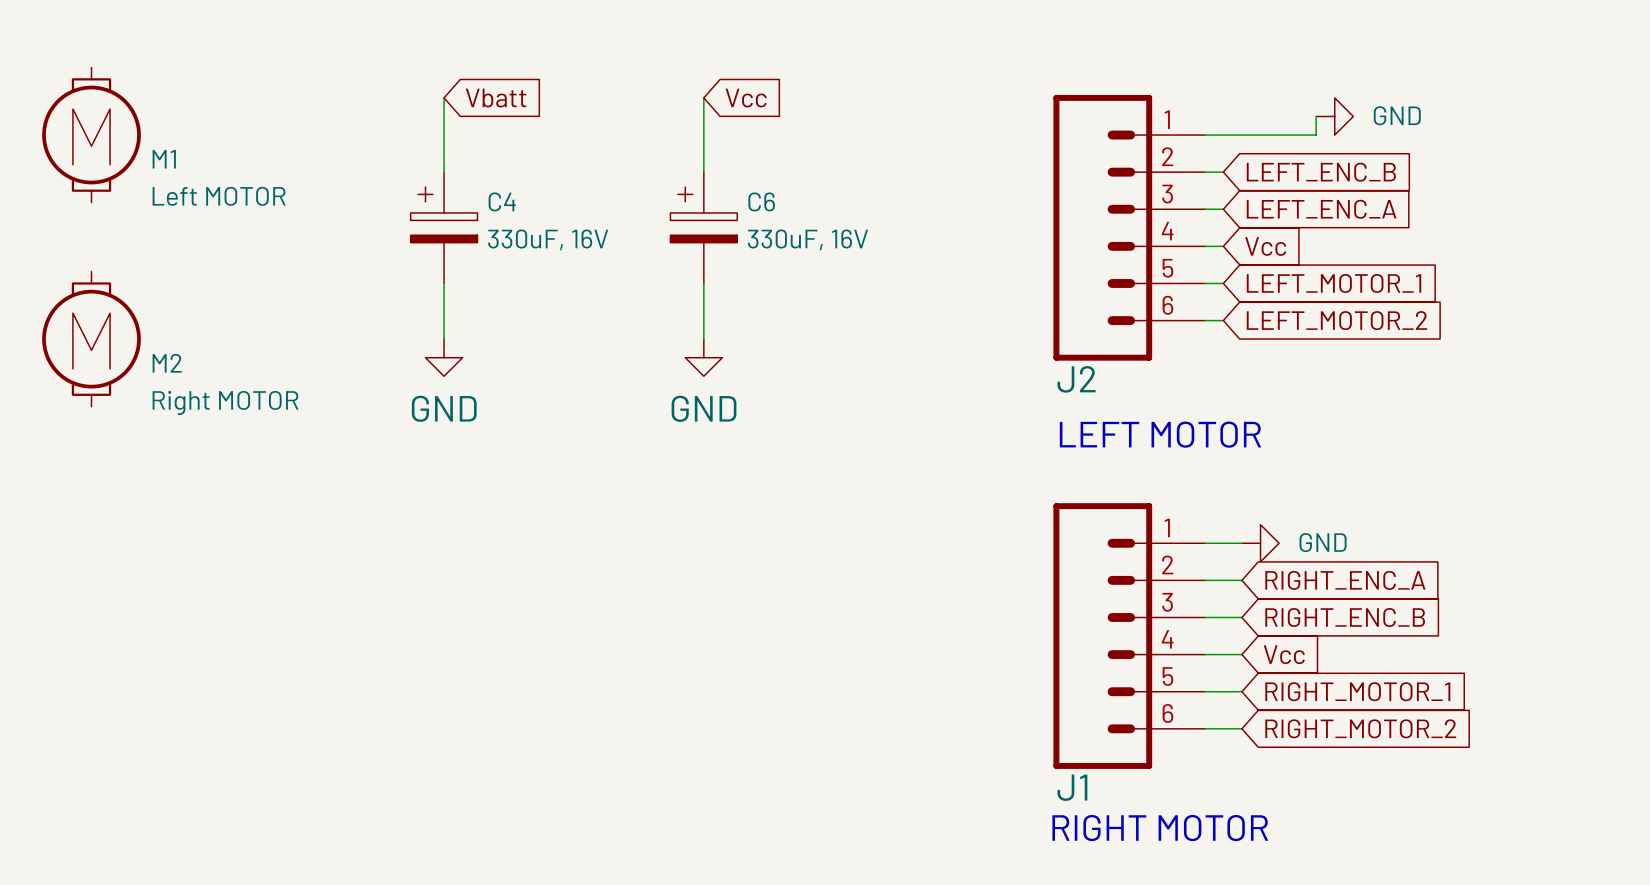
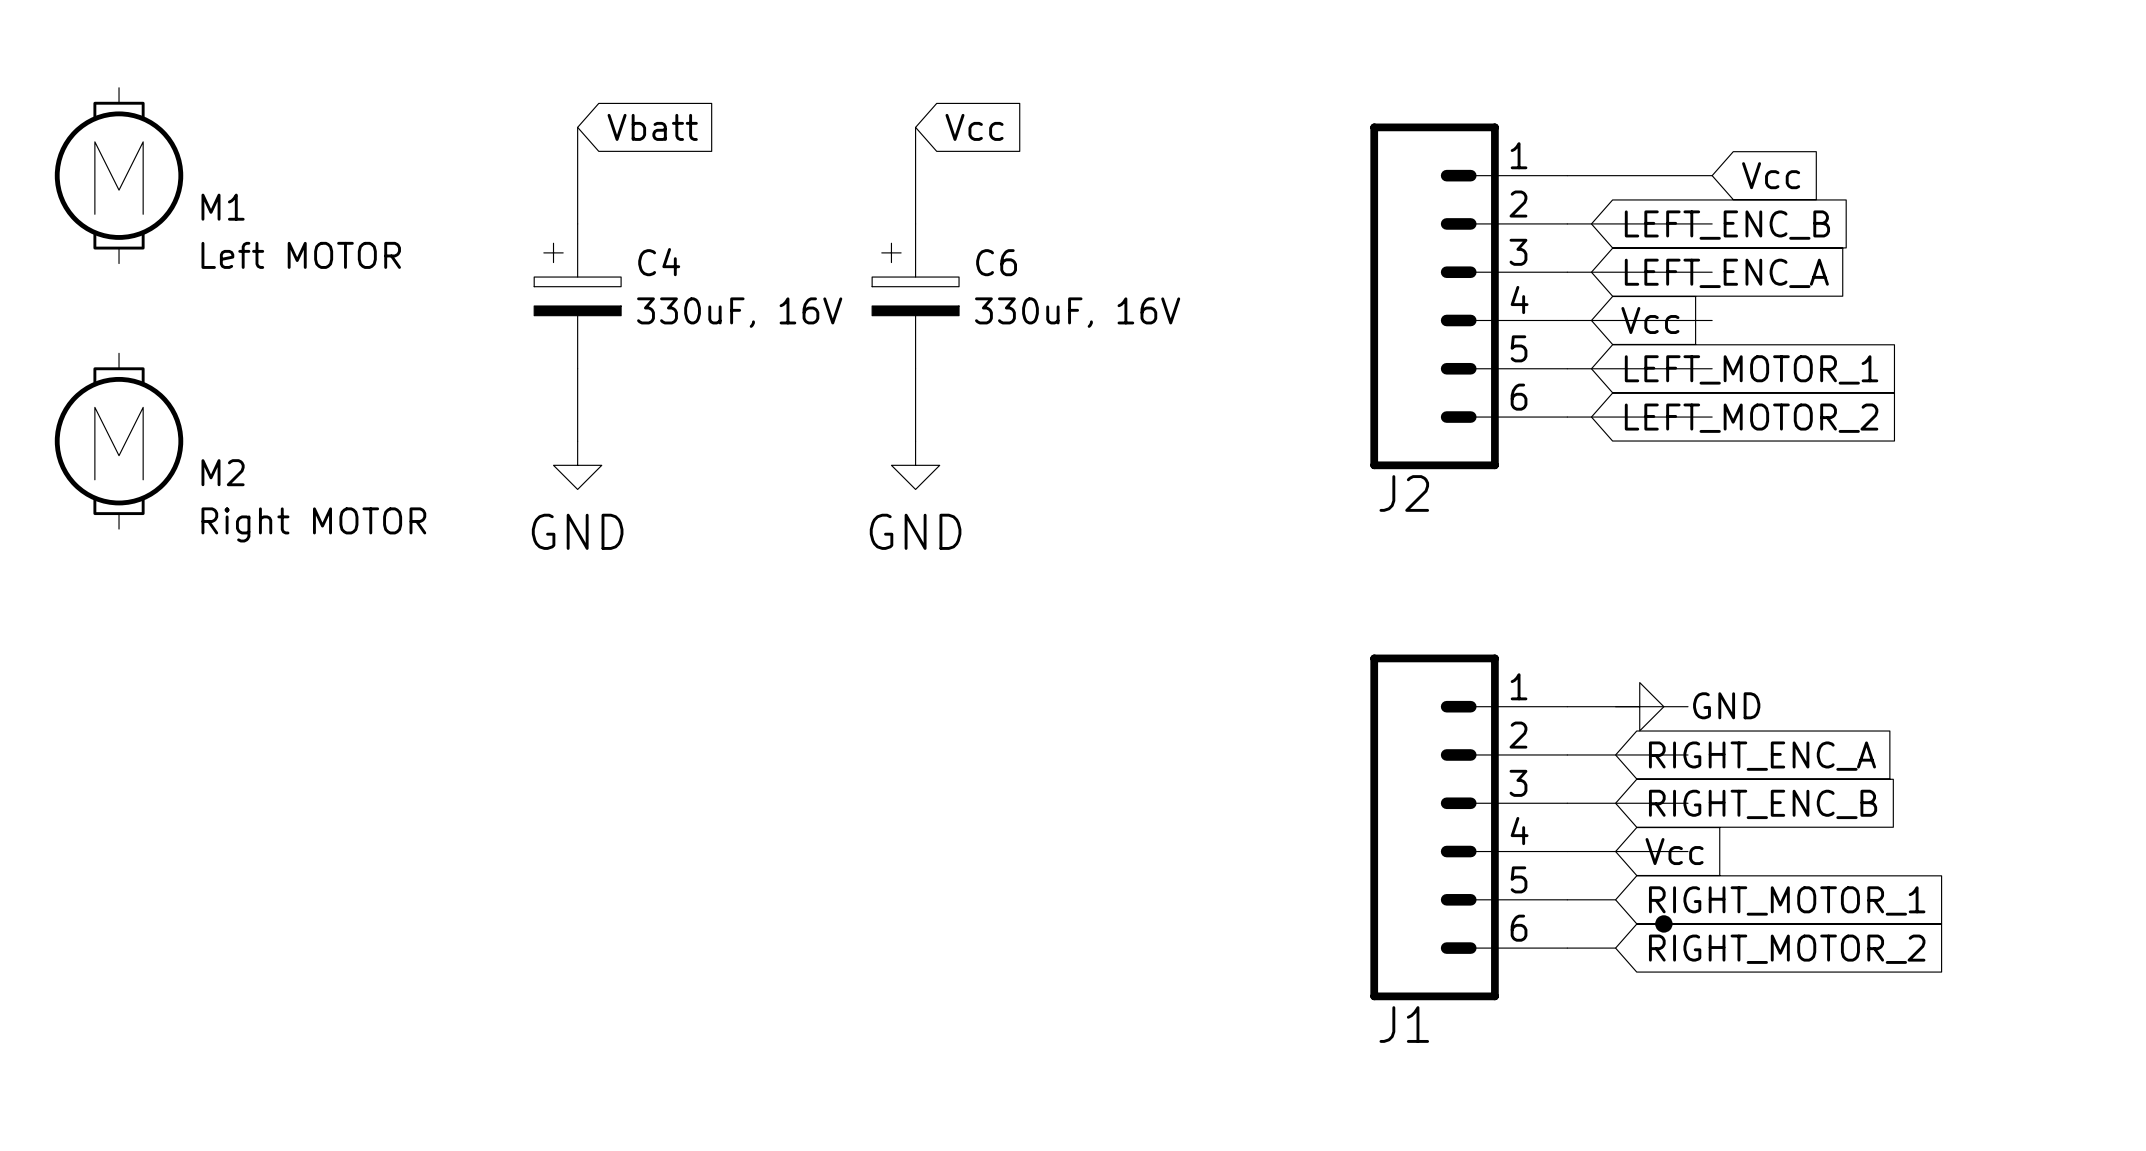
wire: (1316, 116) (1316, 135) -> none
power symbol: GND (1334, 116) -> none
global label: none -> Vcc (1771, 175)
wire: none -> (1591, 223) (1712, 223)
wire: none -> (1591, 272) (1712, 272)
wire: none -> (1591, 320) (1712, 320)
wire: none -> (1591, 368) (1712, 368)
wire: none -> (1591, 417) (1712, 417)
text: LEFT MOTOR (1160, 434) -> none
wire: none -> (1615, 706) (1688, 706)
wire: none -> (1615, 754) (1688, 754)
wire: none -> (1615, 803) (1688, 803)
wire: none -> (1615, 851) (1688, 851)
junction: none -> (1663, 923)
text: RIGHT MOTOR (1160, 828) -> none

